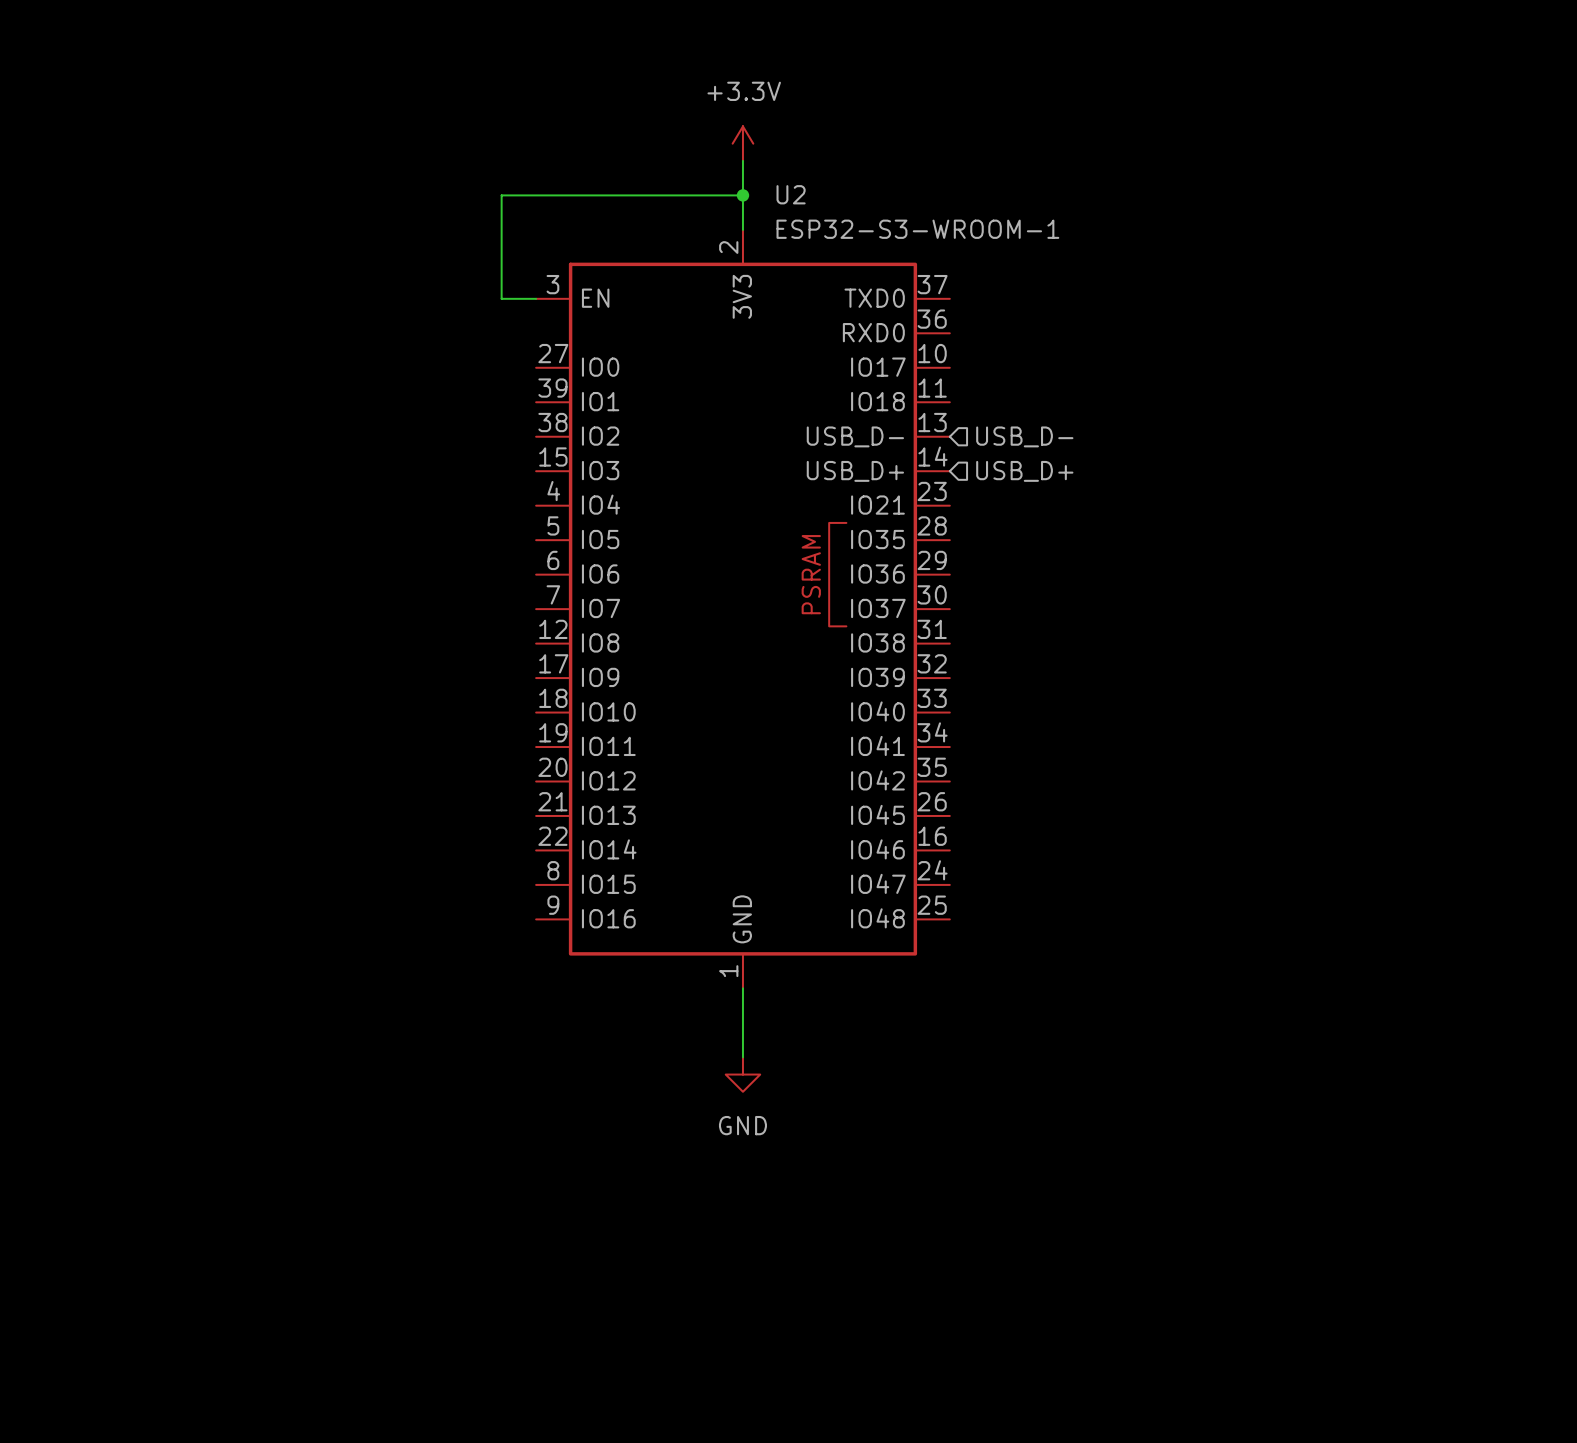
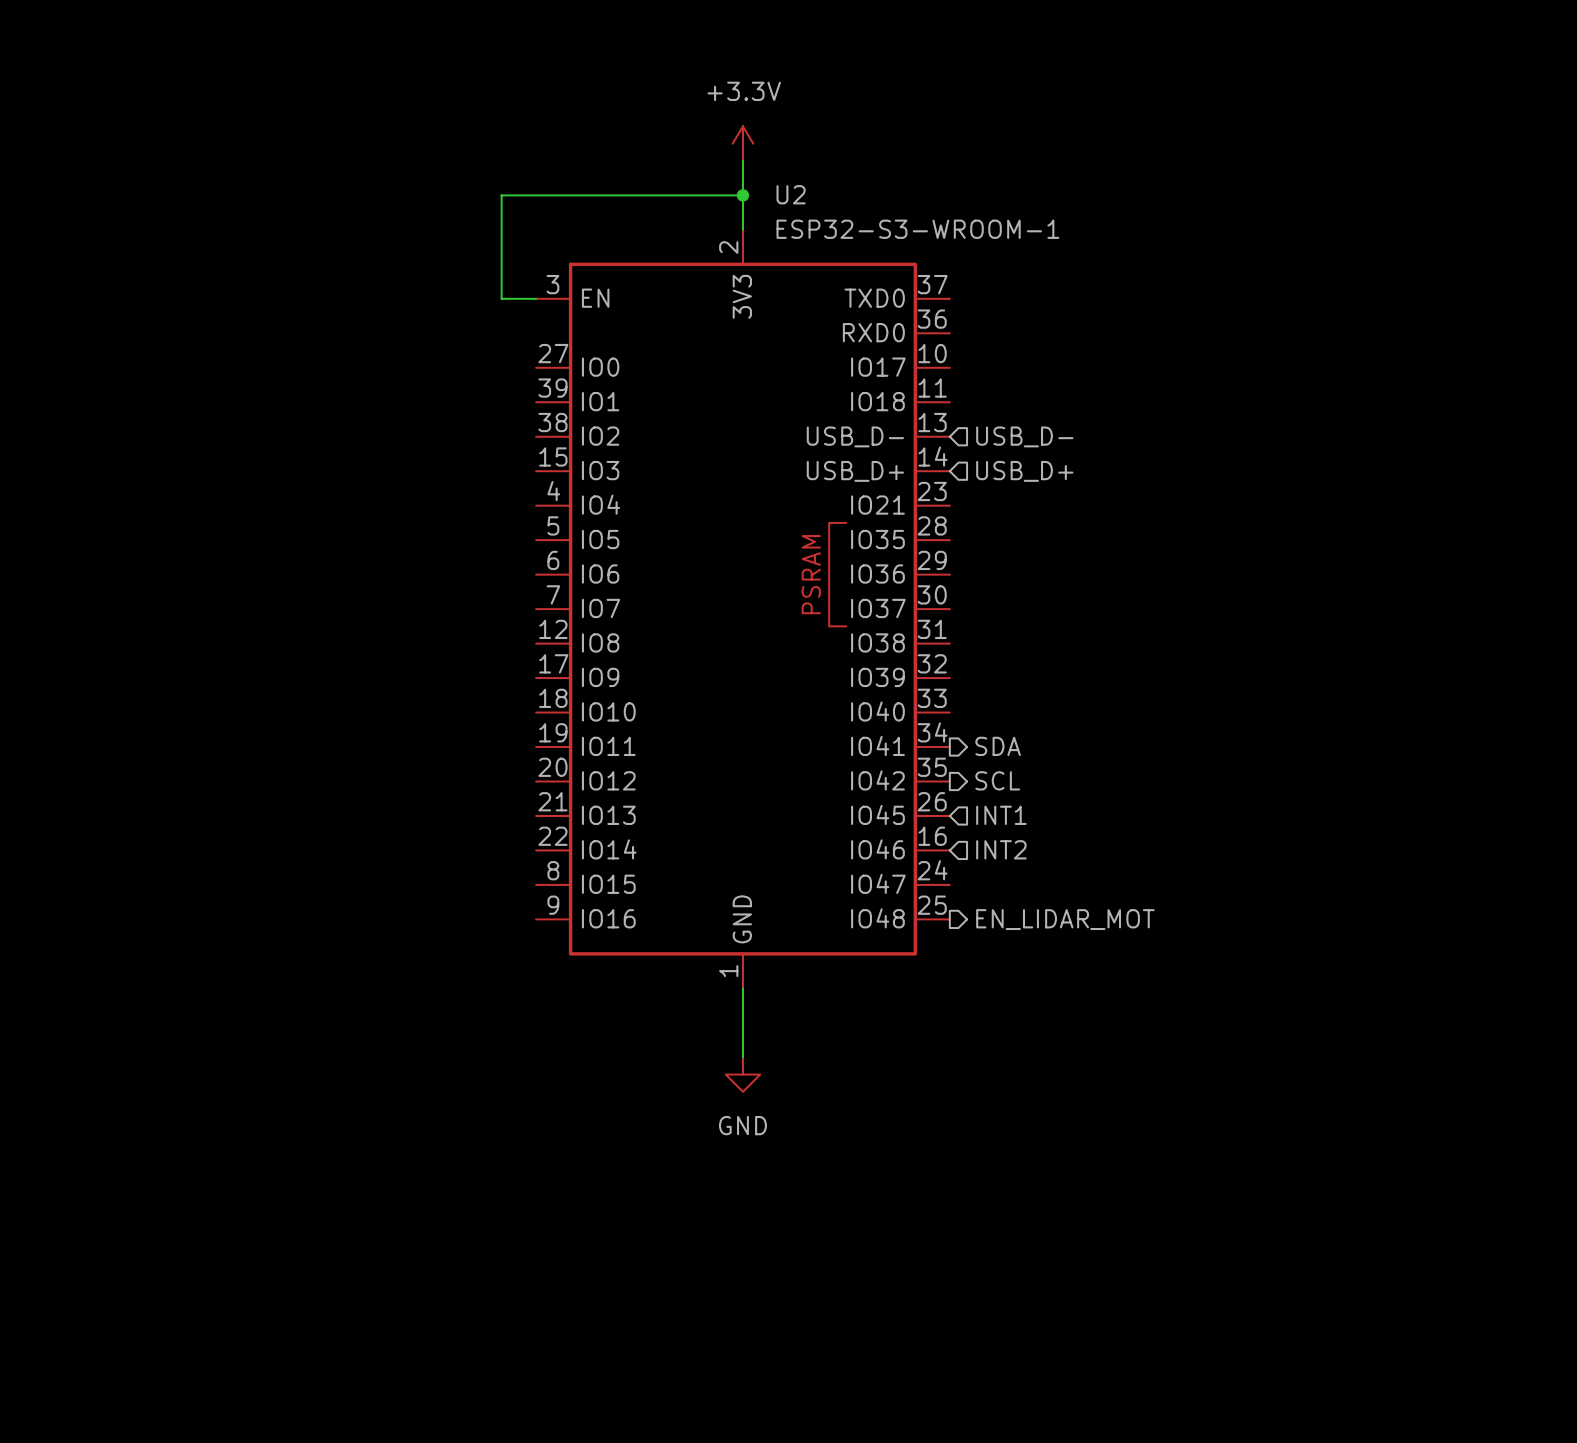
hierarchical label: none -> SDA (998, 746)
hierarchical label: none -> SCL (997, 780)
hierarchical label: none -> INT1 (1001, 815)
hierarchical label: none -> INT2 (1001, 849)
hierarchical label: none -> EN_LIDAR_MOT (1065, 919)

